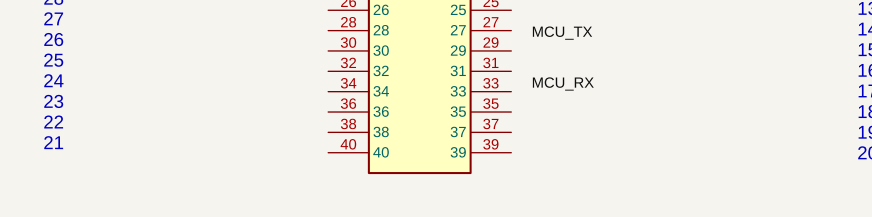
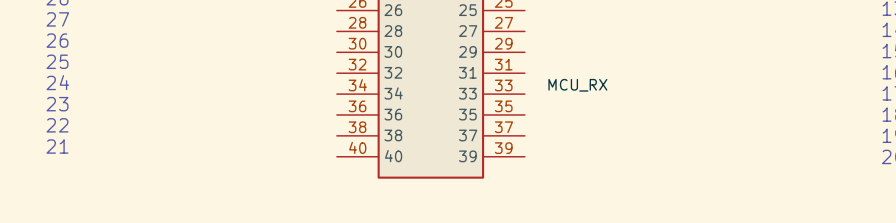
label: MCU_TX (562, 33) -> none

